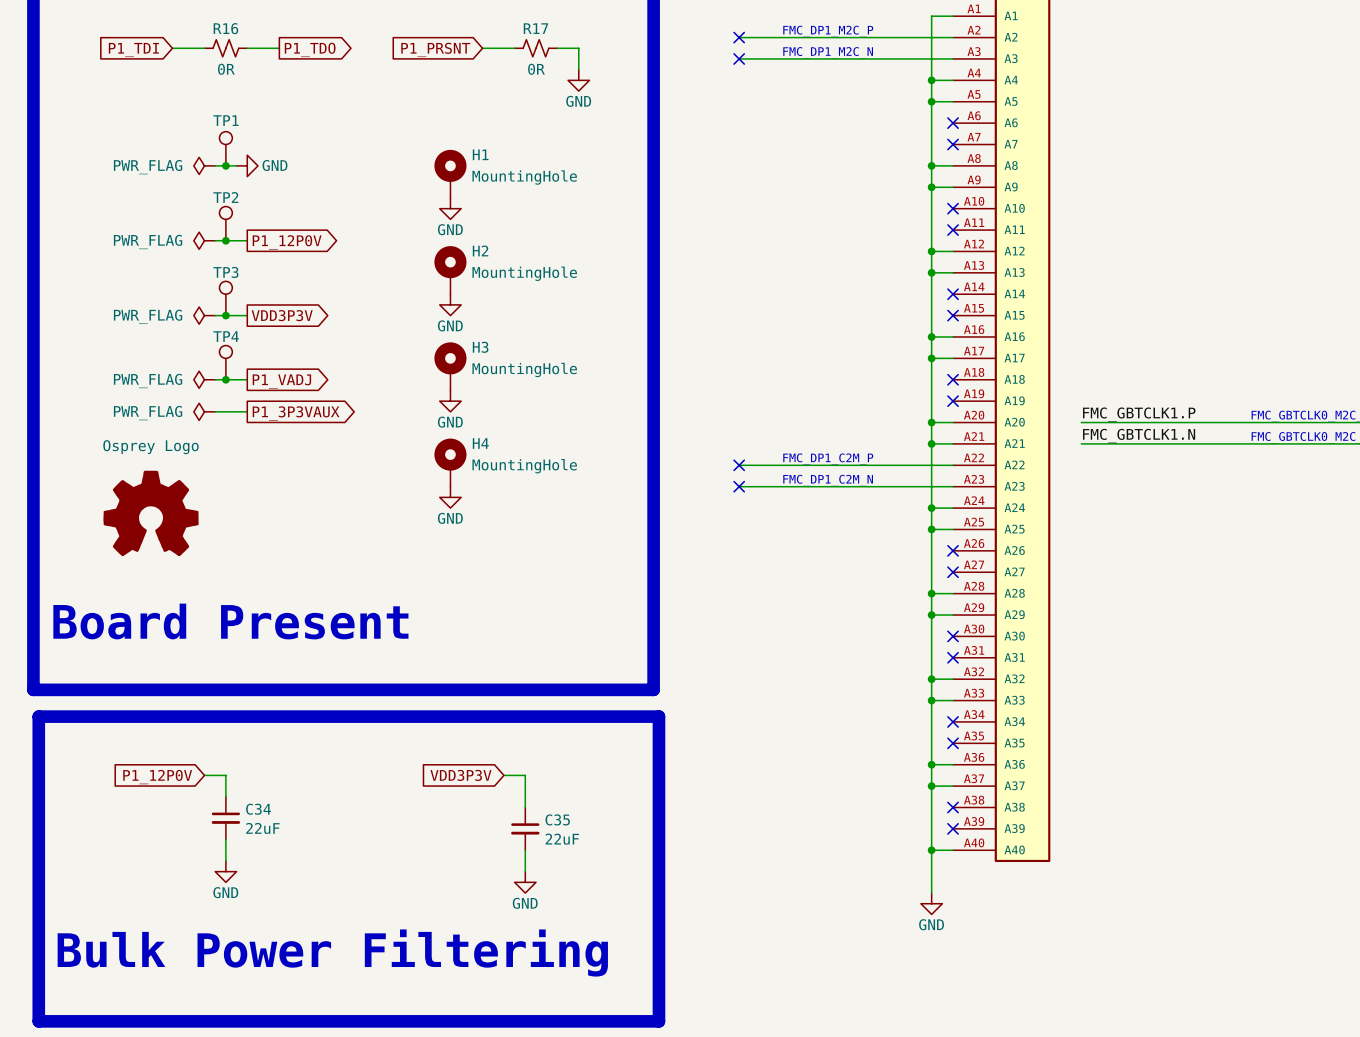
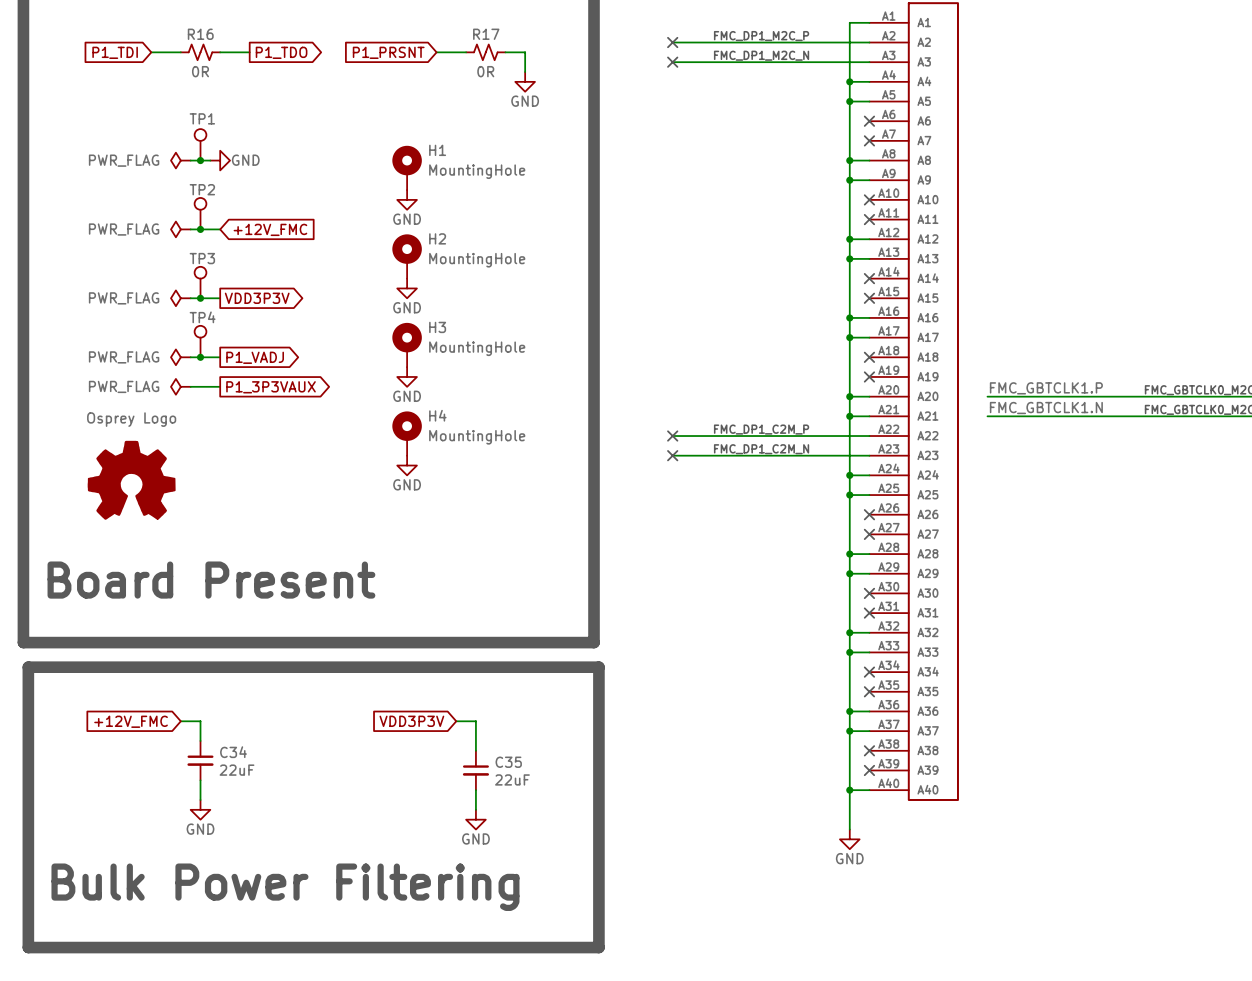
global label shape: output (287, 242) -> input (270, 229)
global label: P1_12P0V (287, 242) -> +12V_FMC (270, 229)
global label: P1_12P0V (157, 777) -> +12V_FMC (131, 721)

